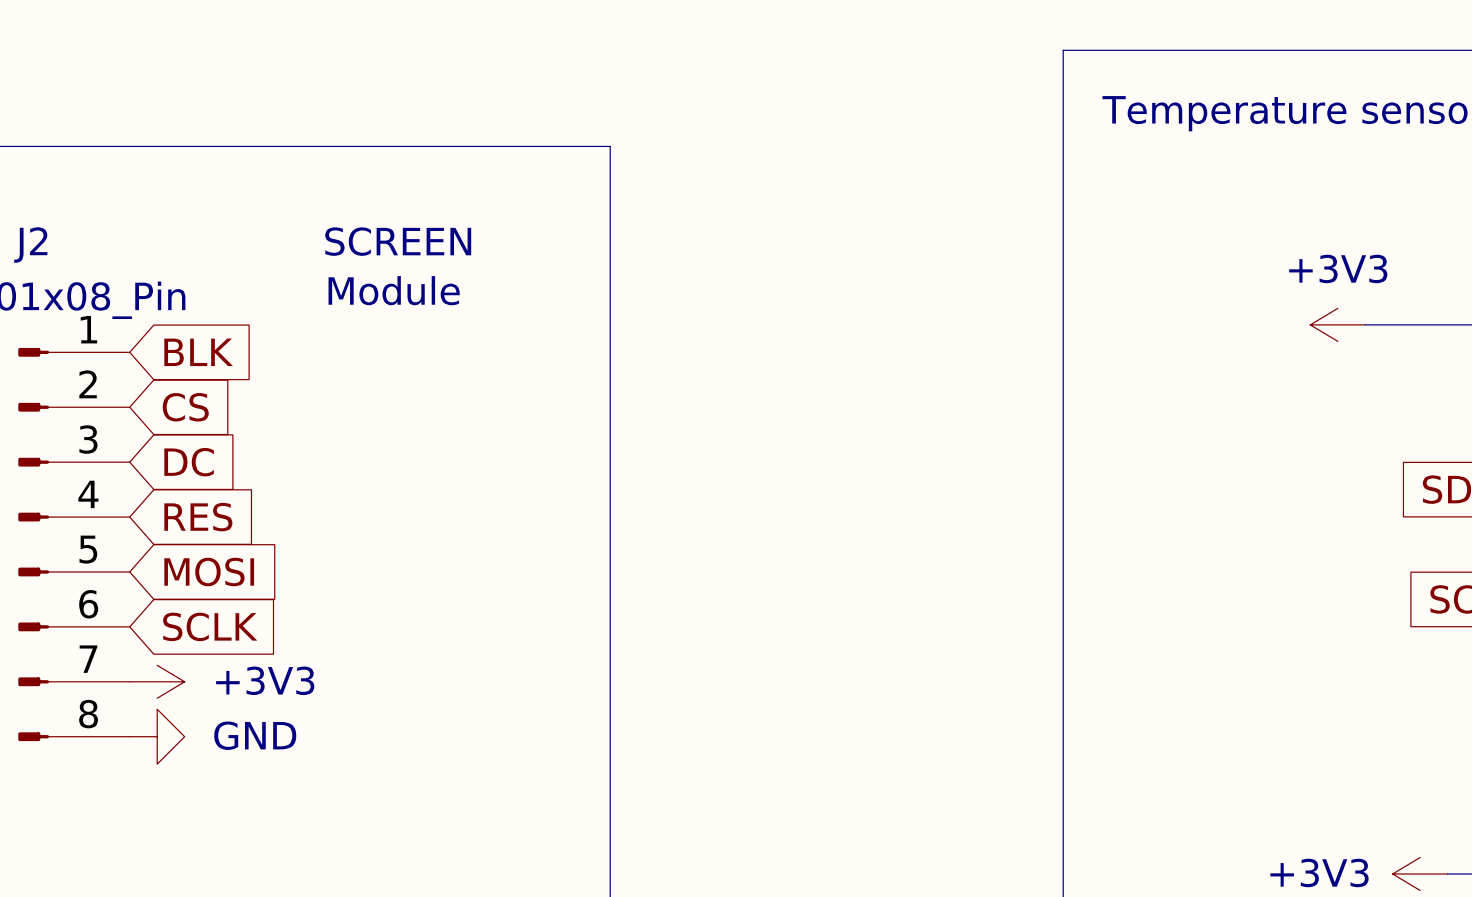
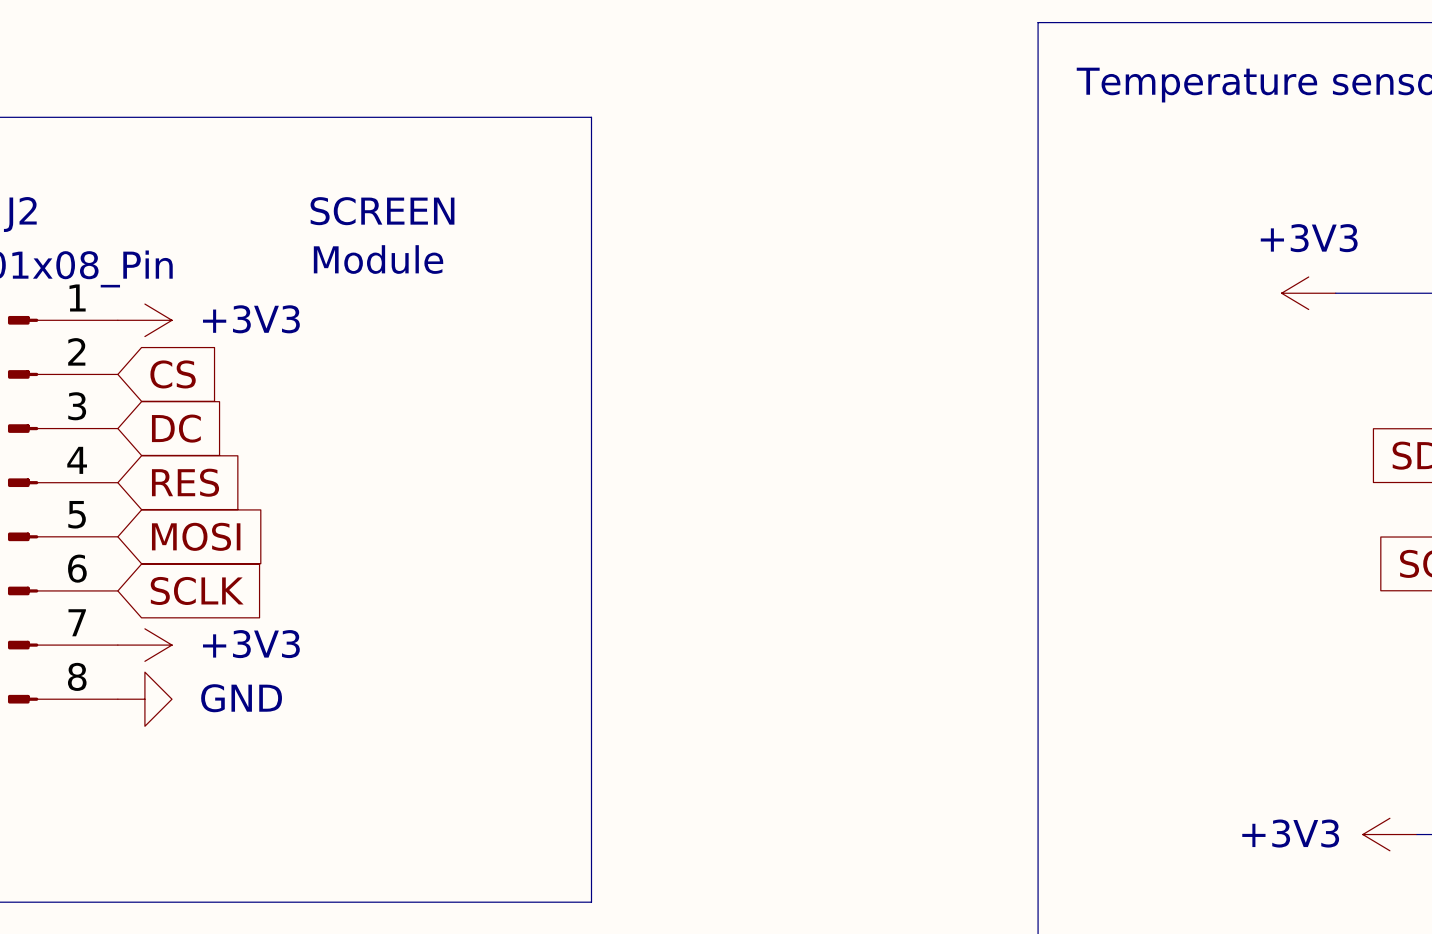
power symbol: none -> +3V3 (144, 320)
global label: BLK (198, 352) -> none

